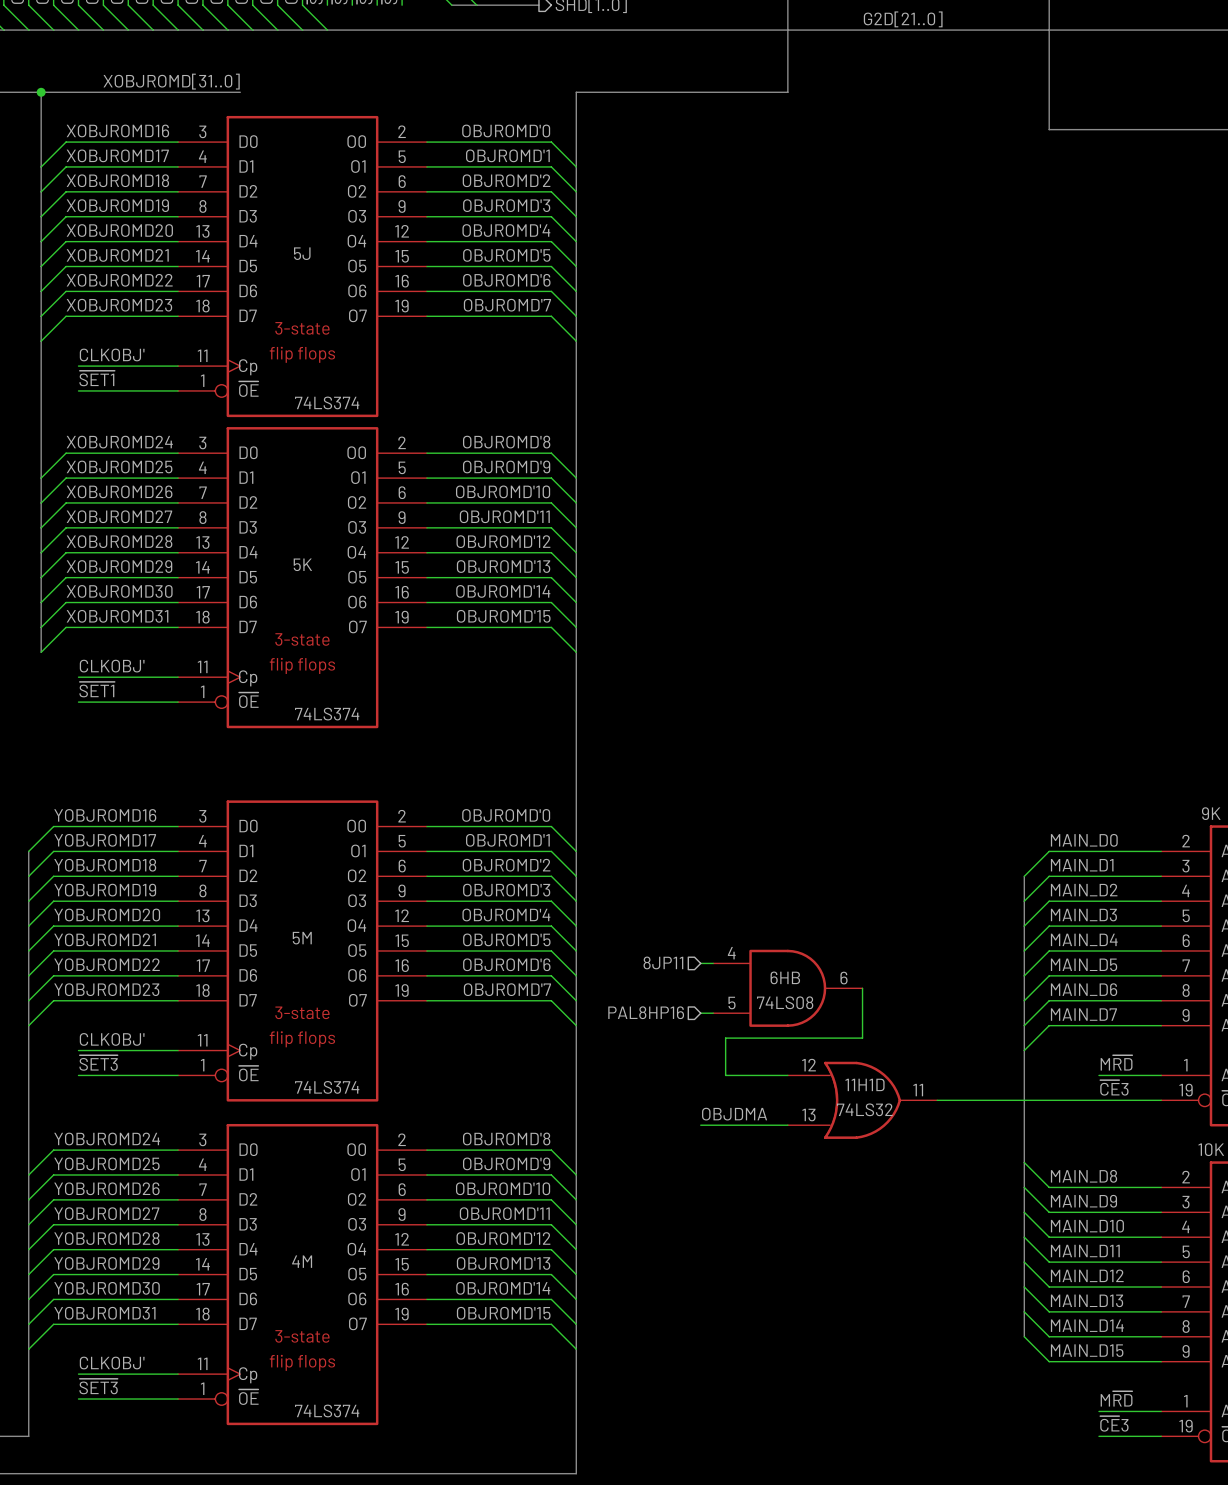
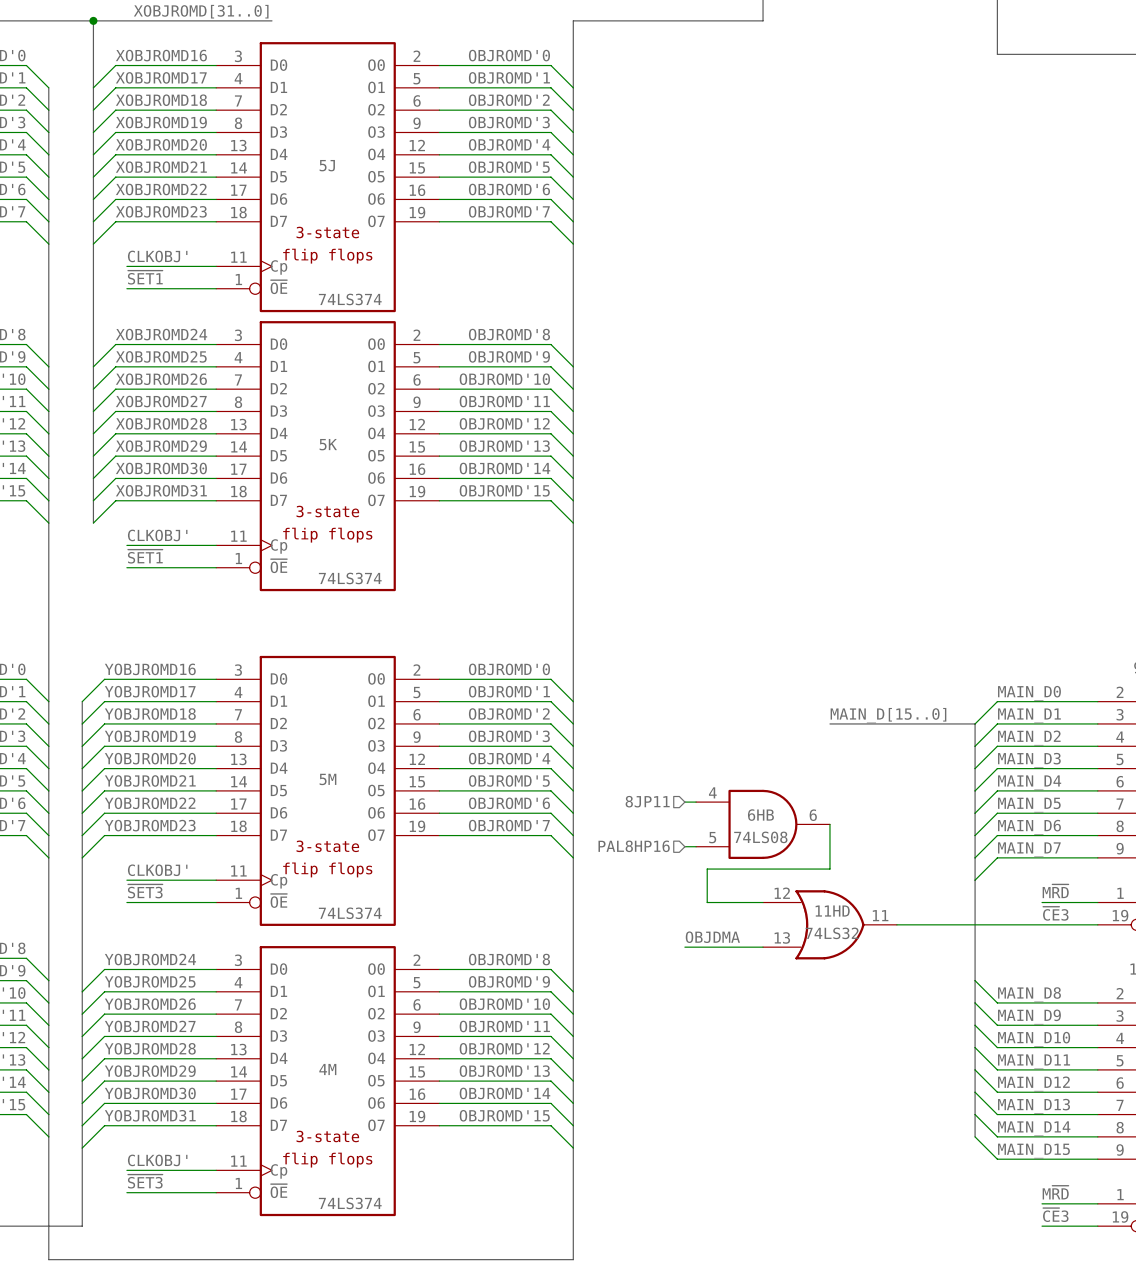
label: none -> MAIN_D[15..0] (888, 715)
bus: none -> (829, 723) (975, 723)
11H1D name: 11H1D (864, 1084) -> 11HD (832, 911)

